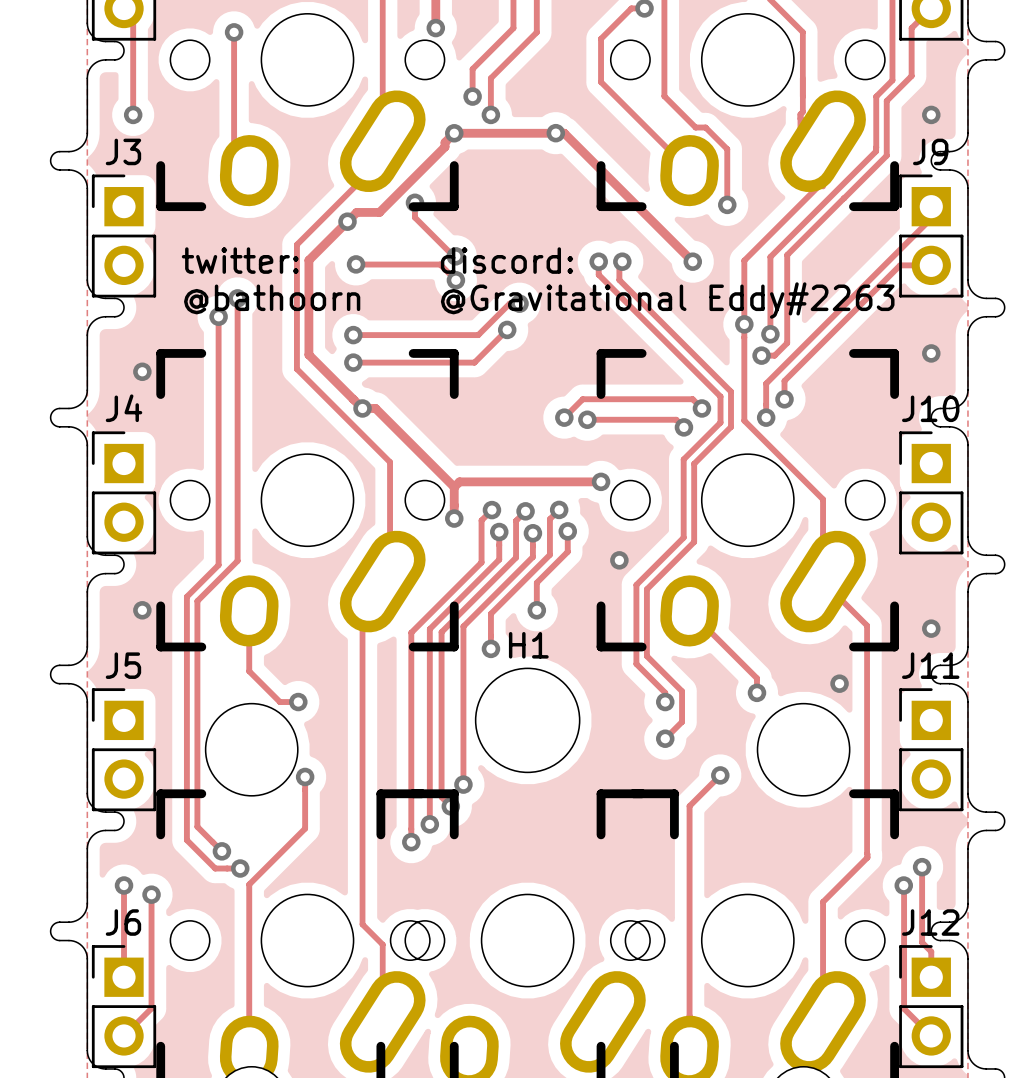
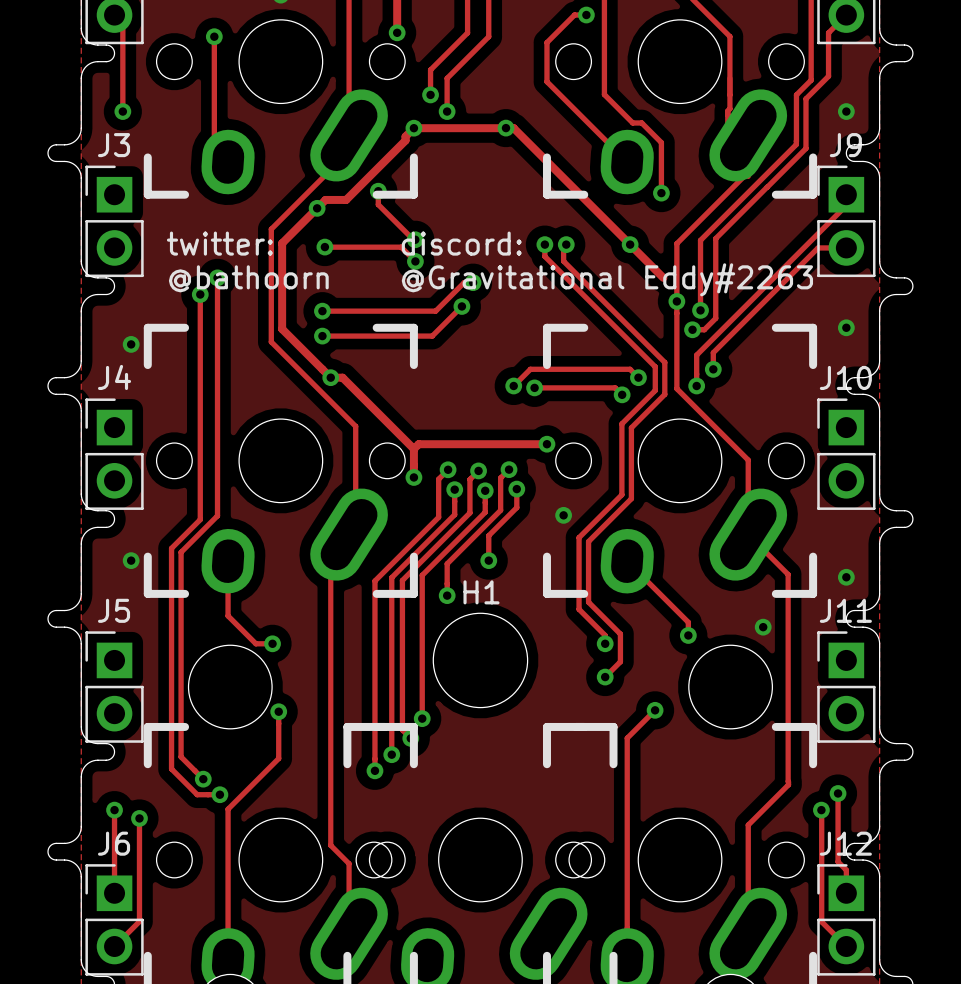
track: none -> (630, 244) (663, 277)

